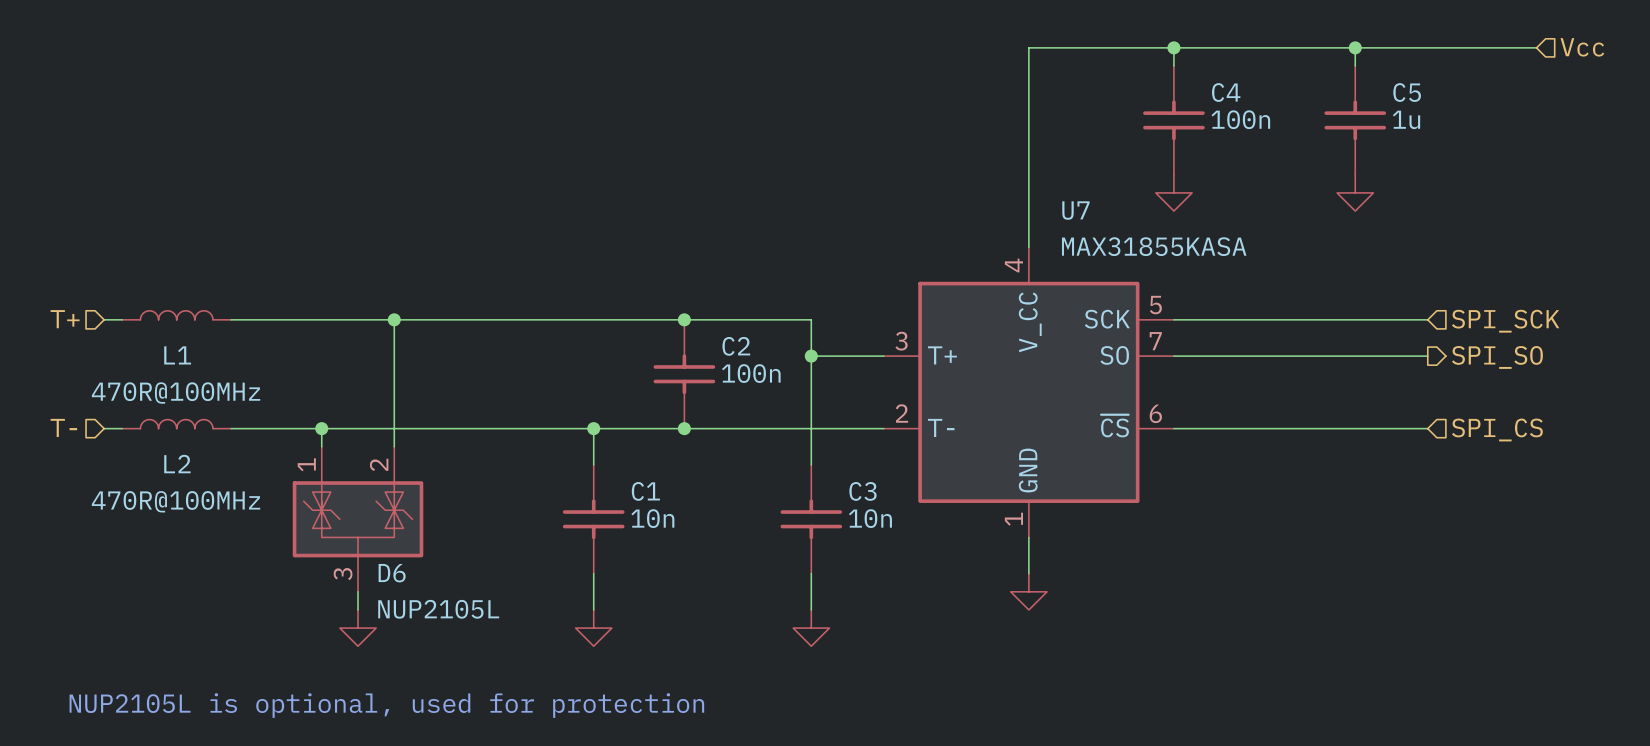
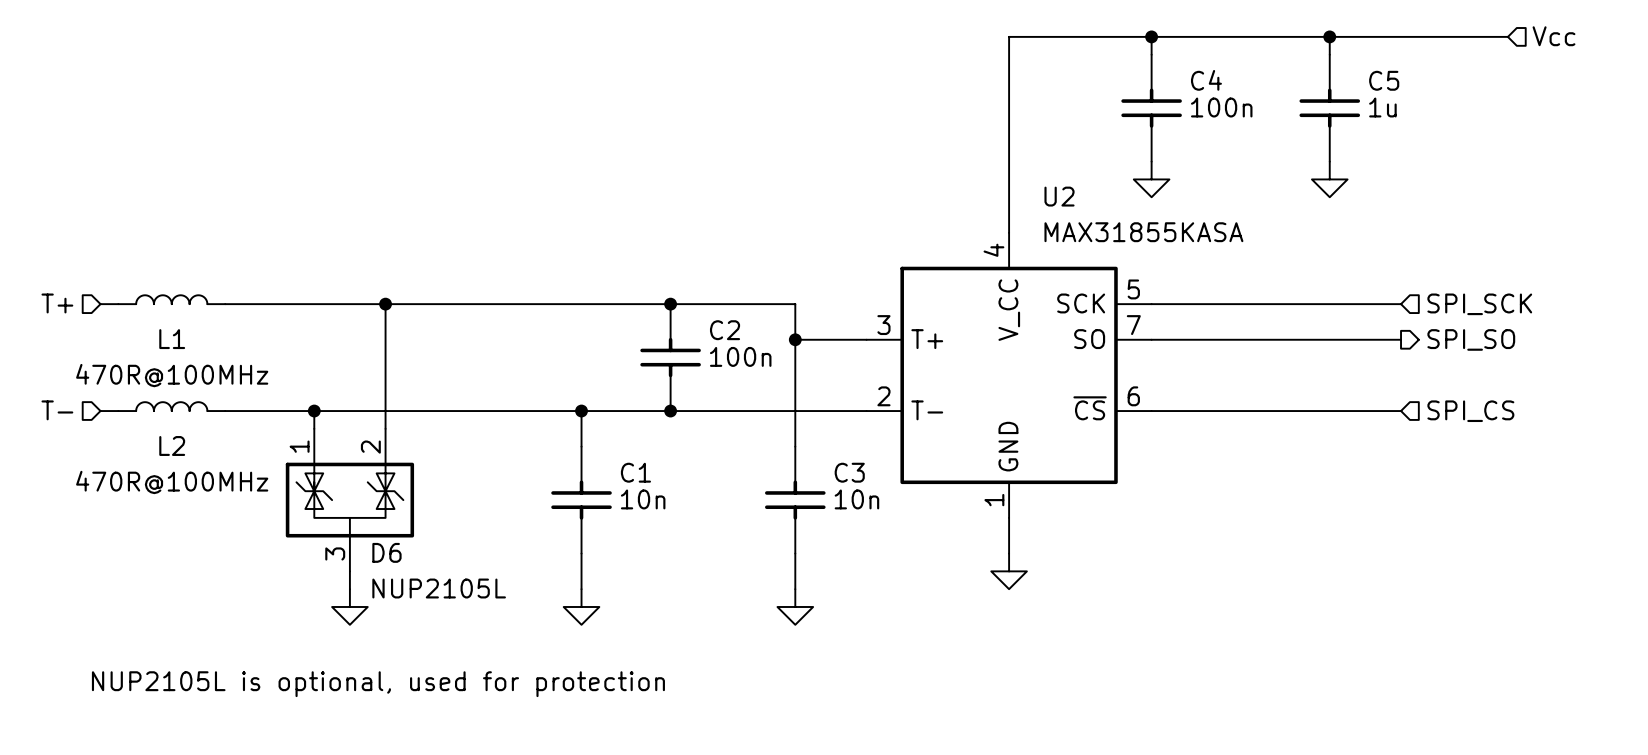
U7 name: U7 (1075, 210) -> U2 (1059, 196)

